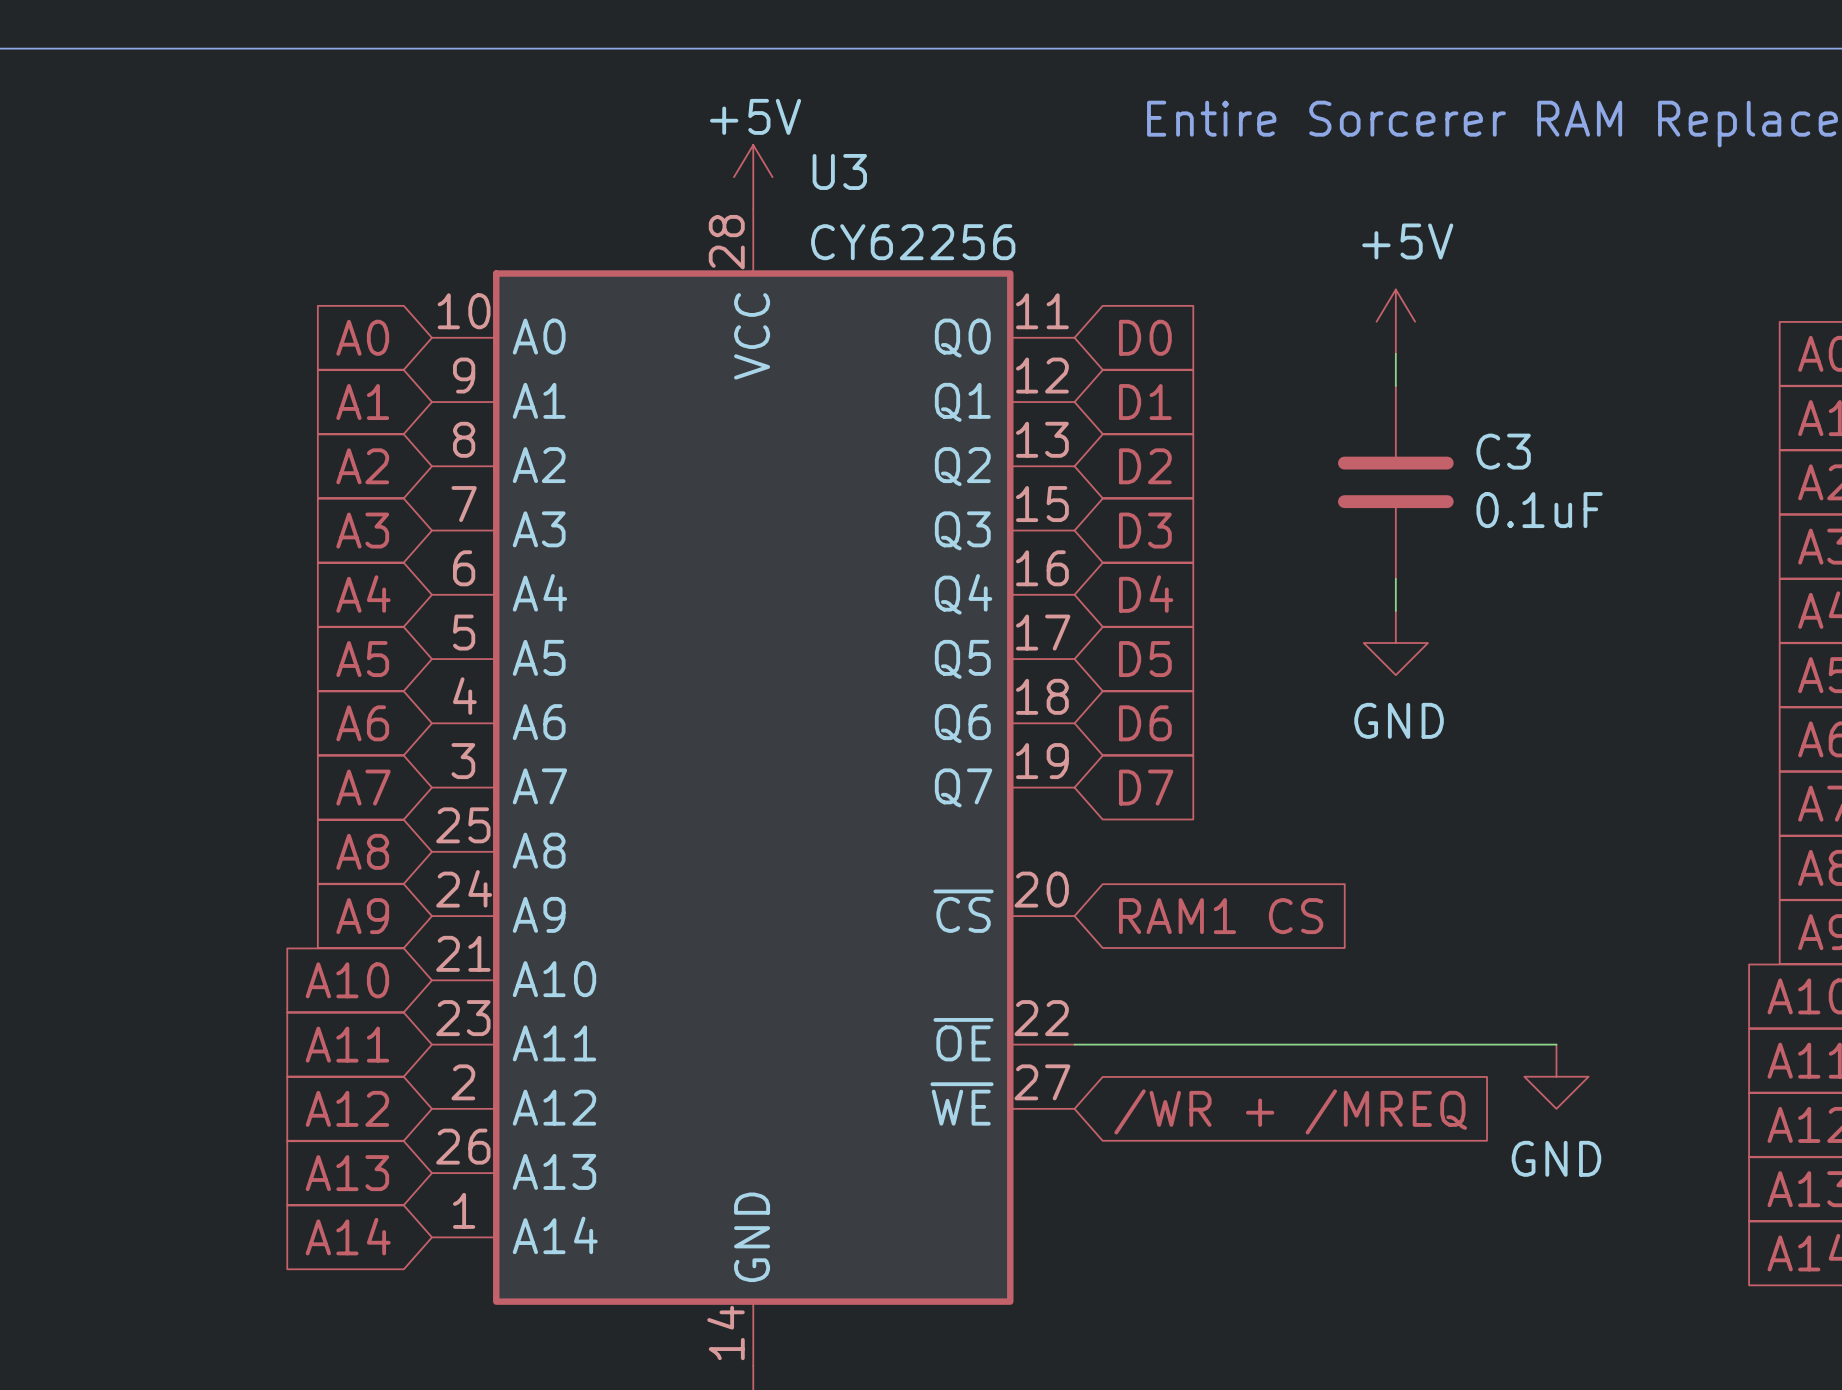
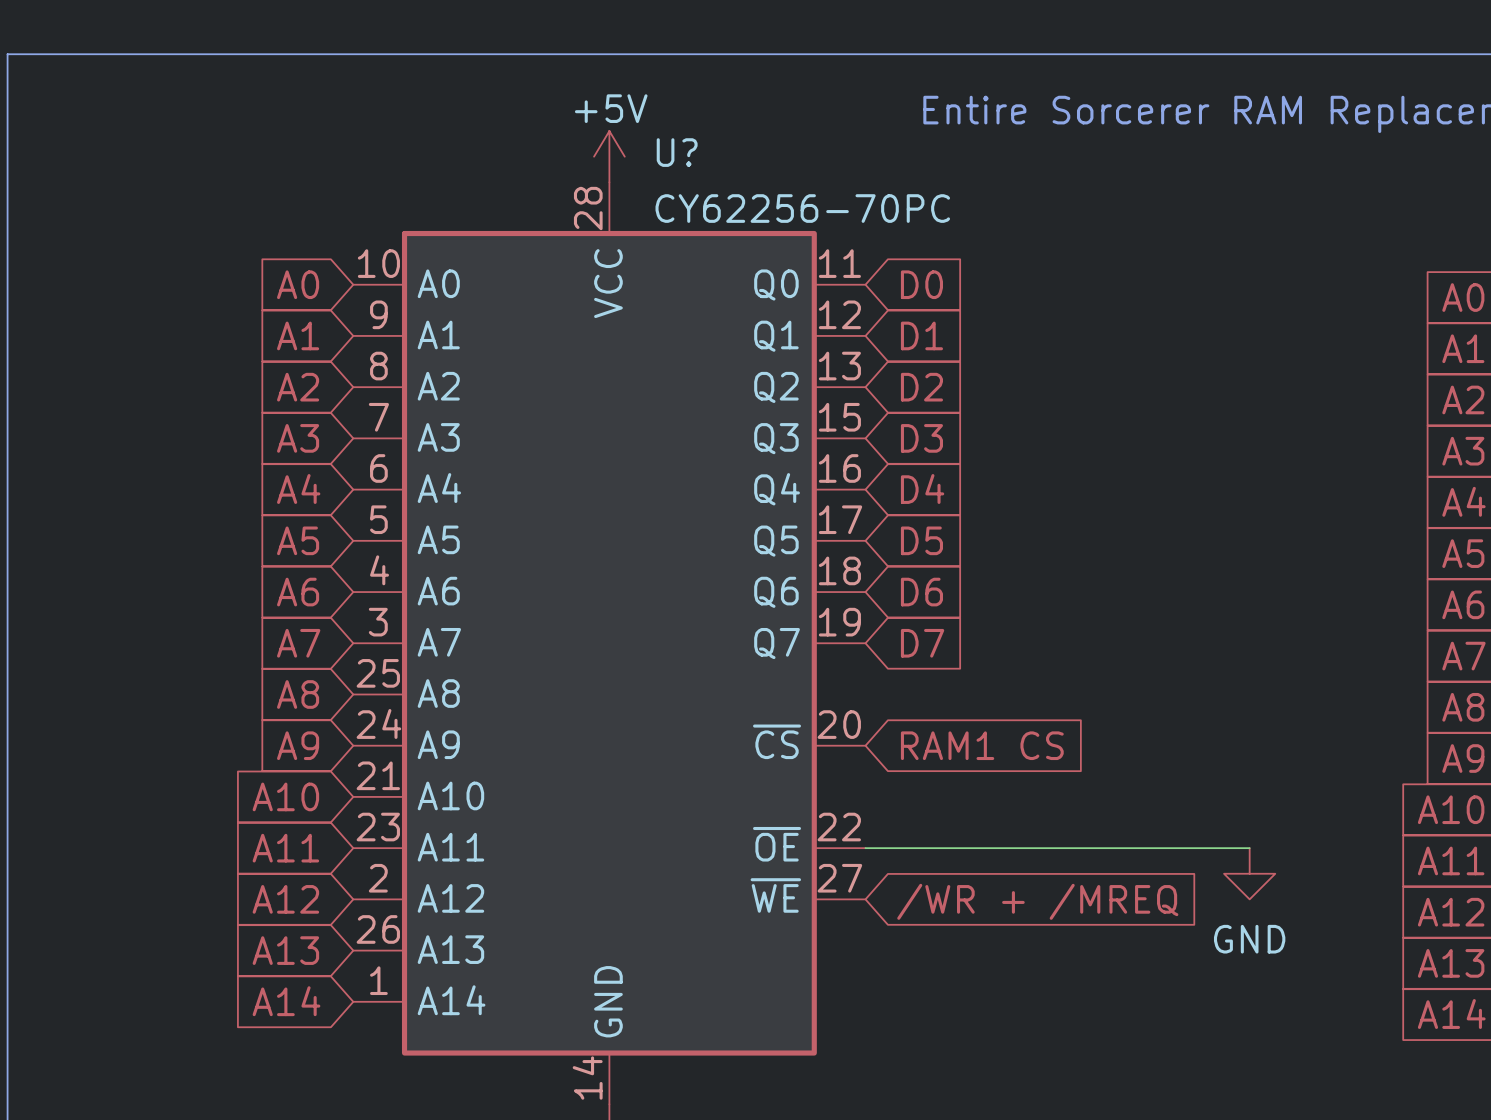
U3 name: U3 (839, 171) -> U? (677, 152)
U3 value: CY62256 (913, 242) -> CY62256-70PC (802, 208)
power symbol: +5V (1395, 321) -> none
wire: (1395, 353) (1395, 385) -> none
C3: 0.1uF (1395, 482) -> none
wire: (1395, 578) (1395, 610) -> none
power symbol: GND (1395, 643) -> none

